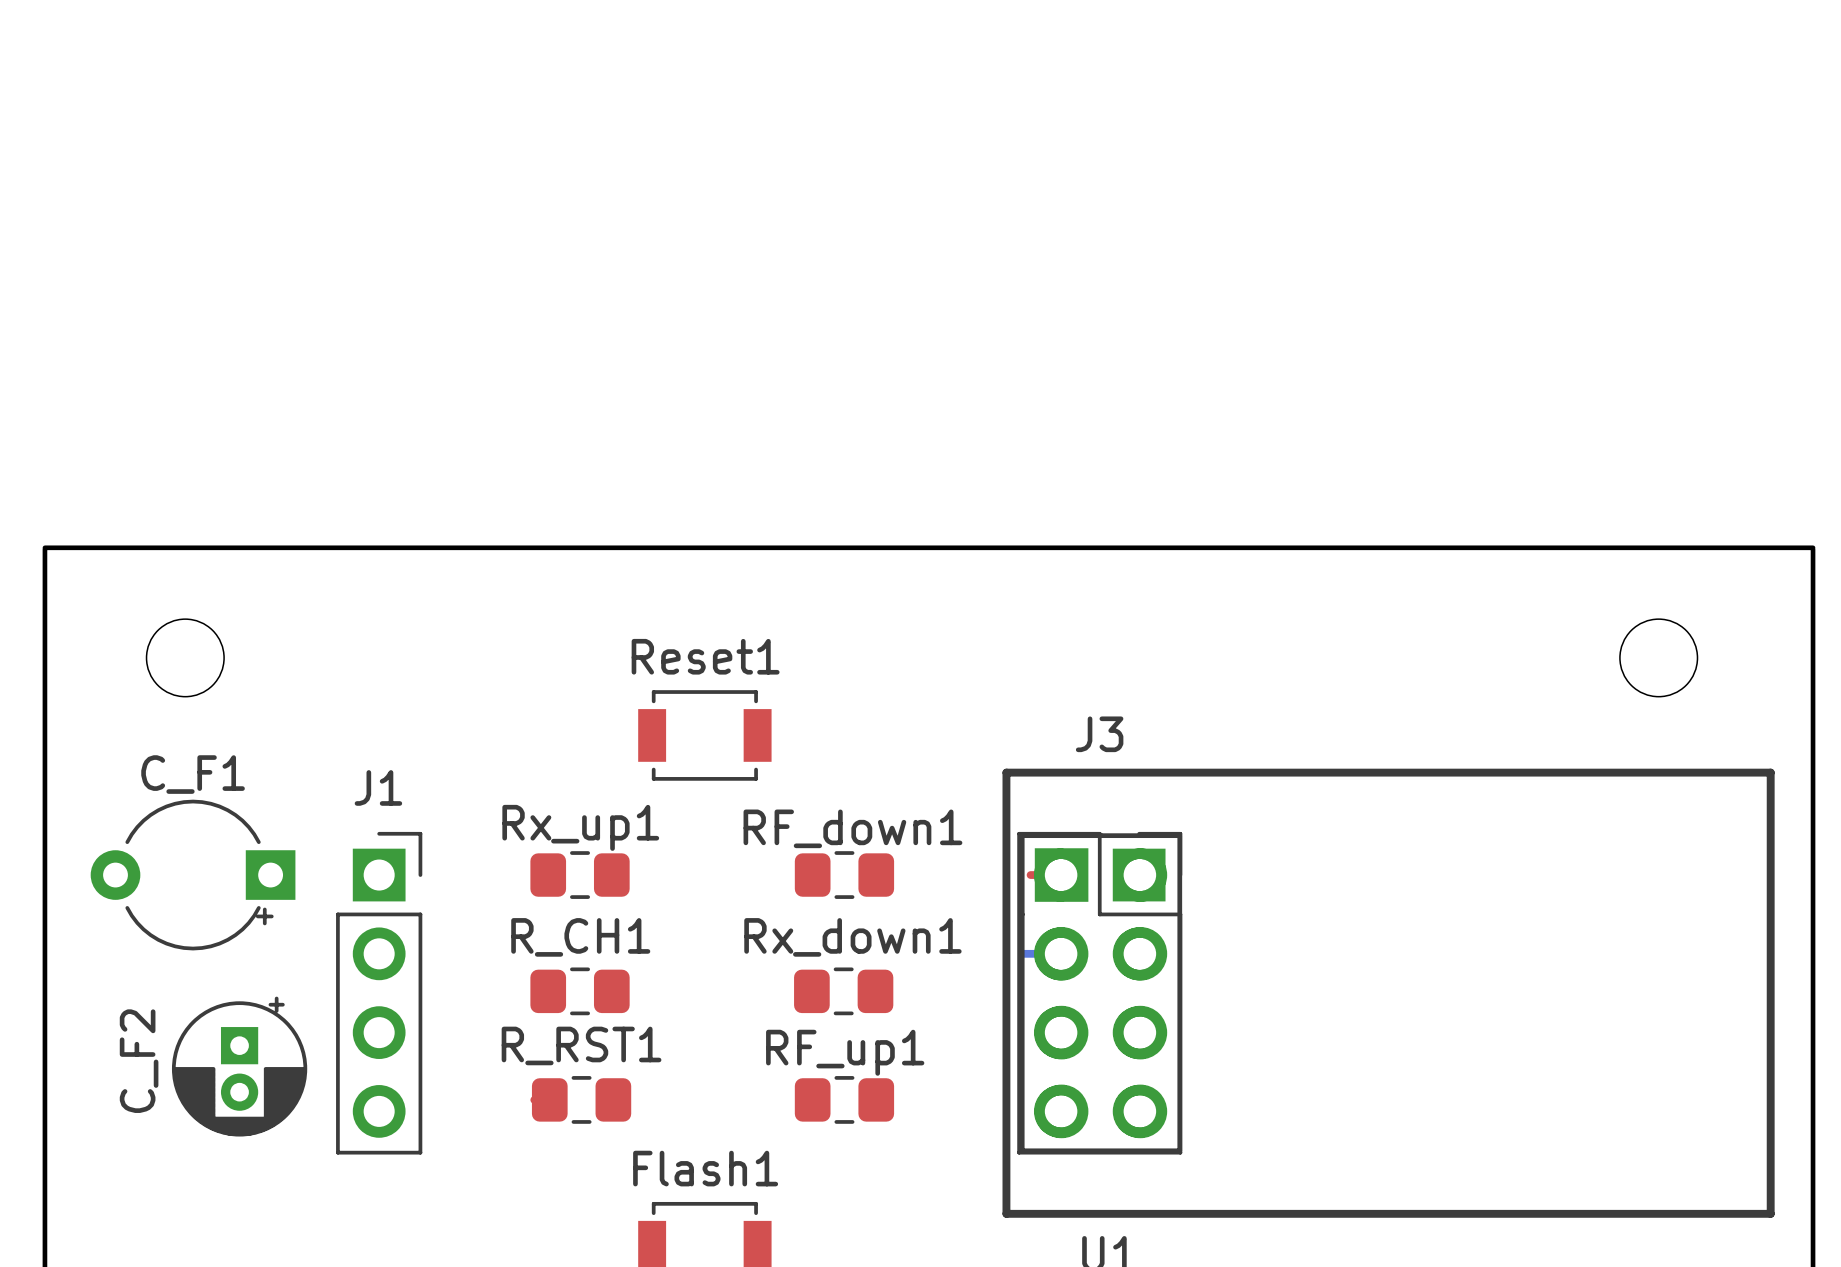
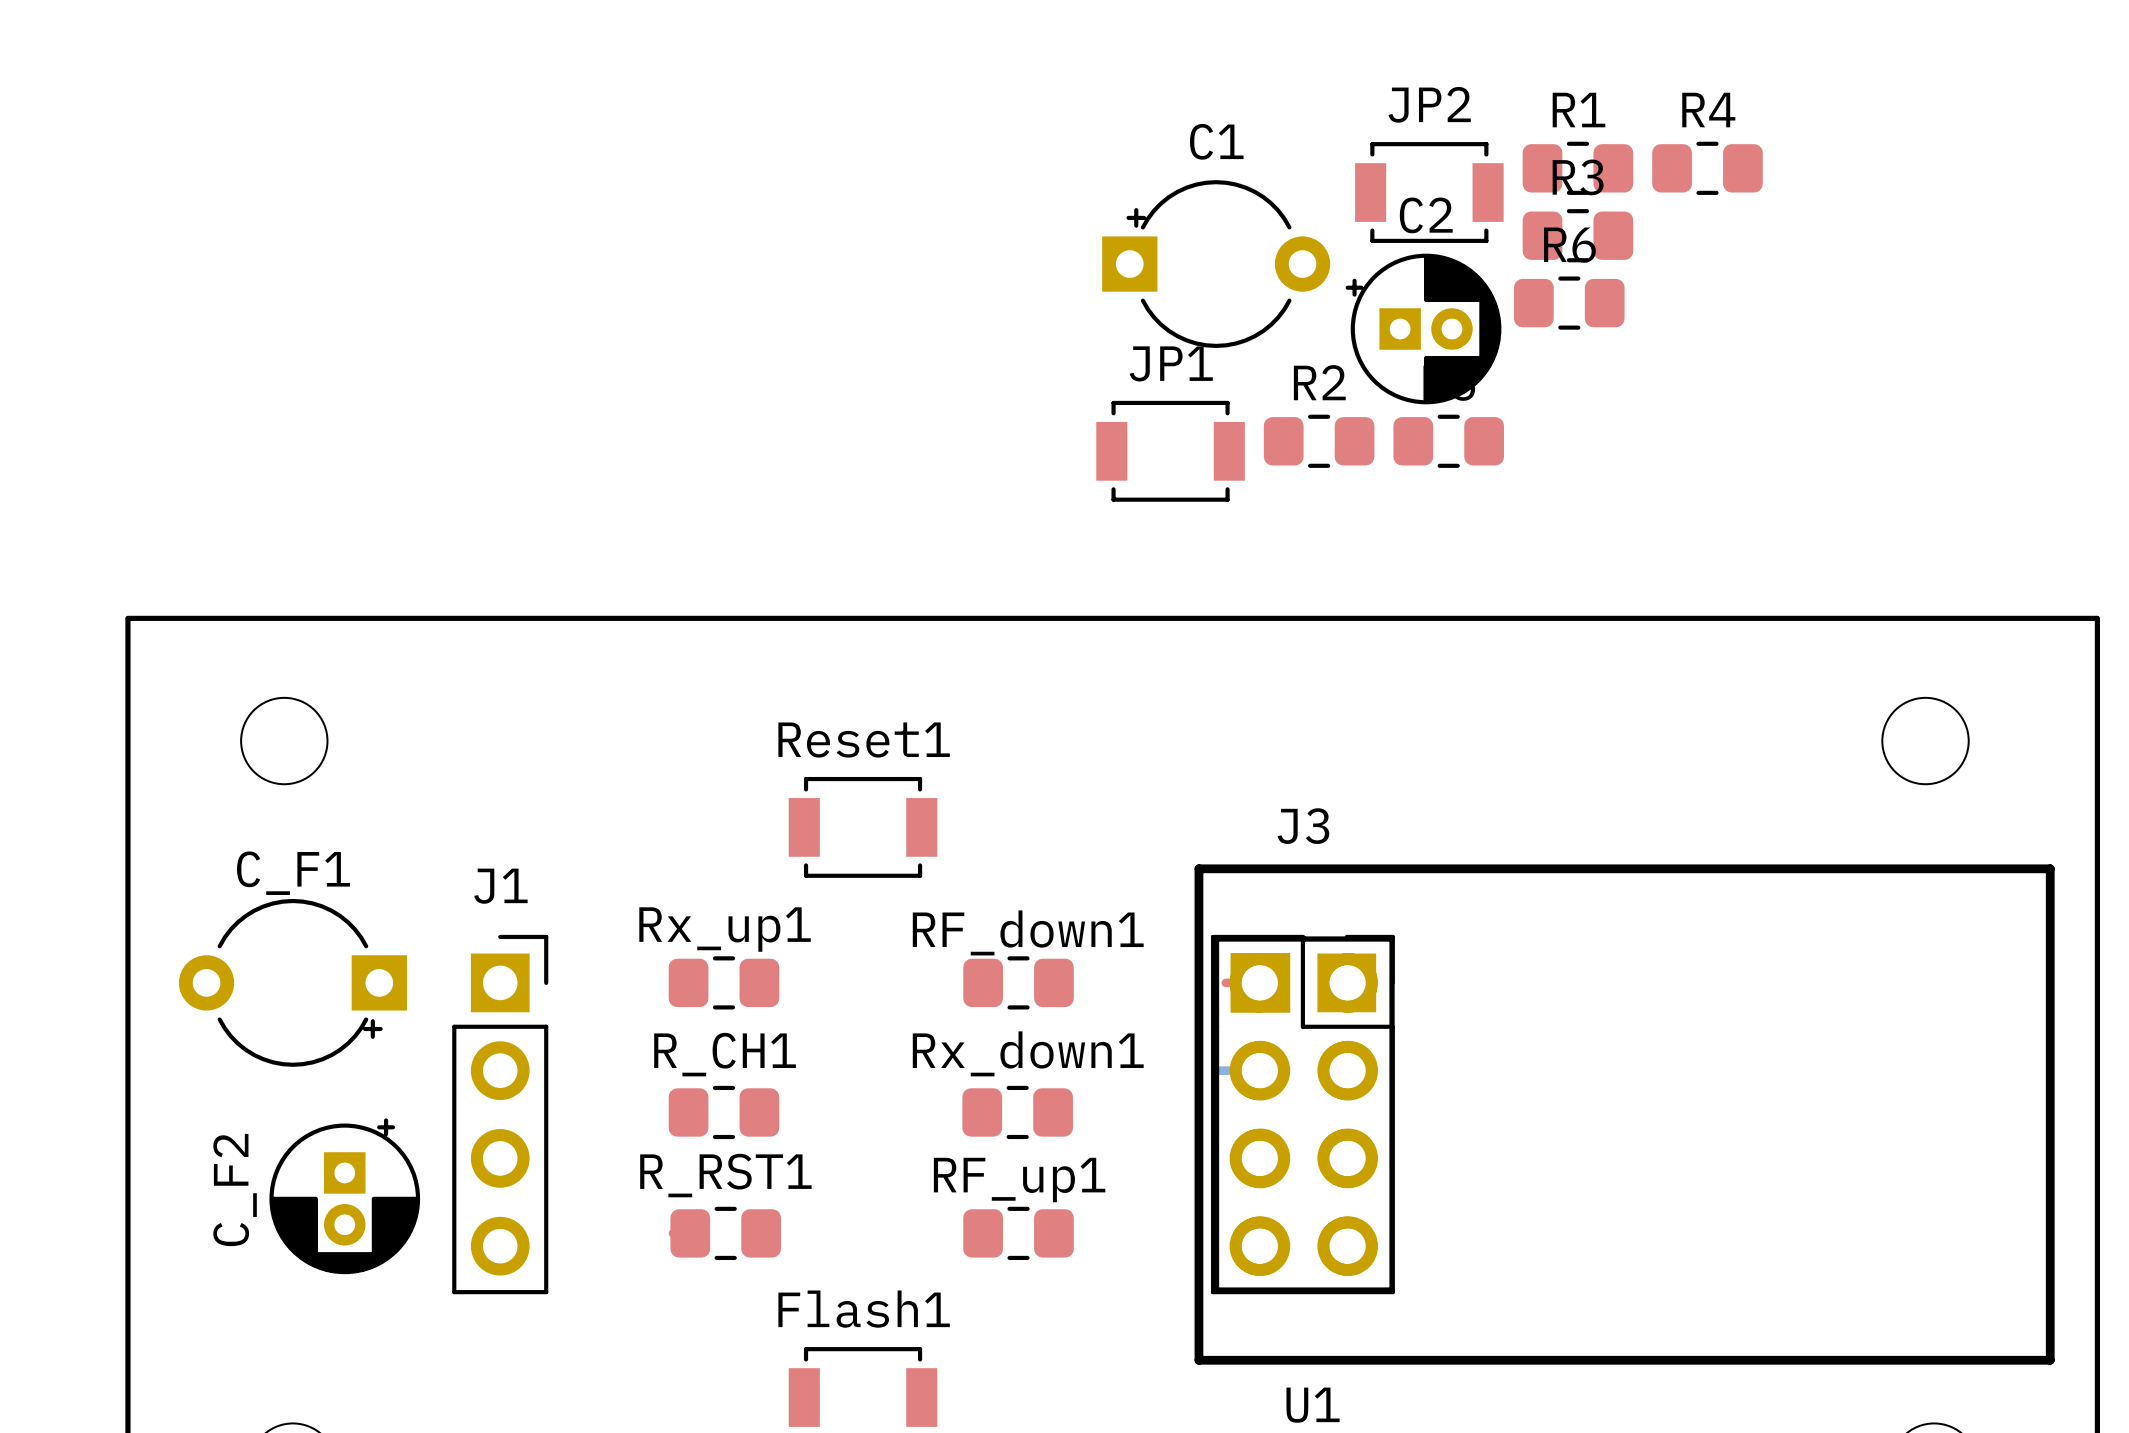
R1: none -> (1577, 168)
R4: none -> (1707, 168)
JP2: none -> (1429, 192)
R3: none -> (1577, 235)
C1: none -> (1216, 264)
R6: none -> (1569, 303)
C2: none -> (1423, 329)
R2: none -> (1319, 441)
part: none -> (1448, 441)
JP1: none -> (1170, 451)

